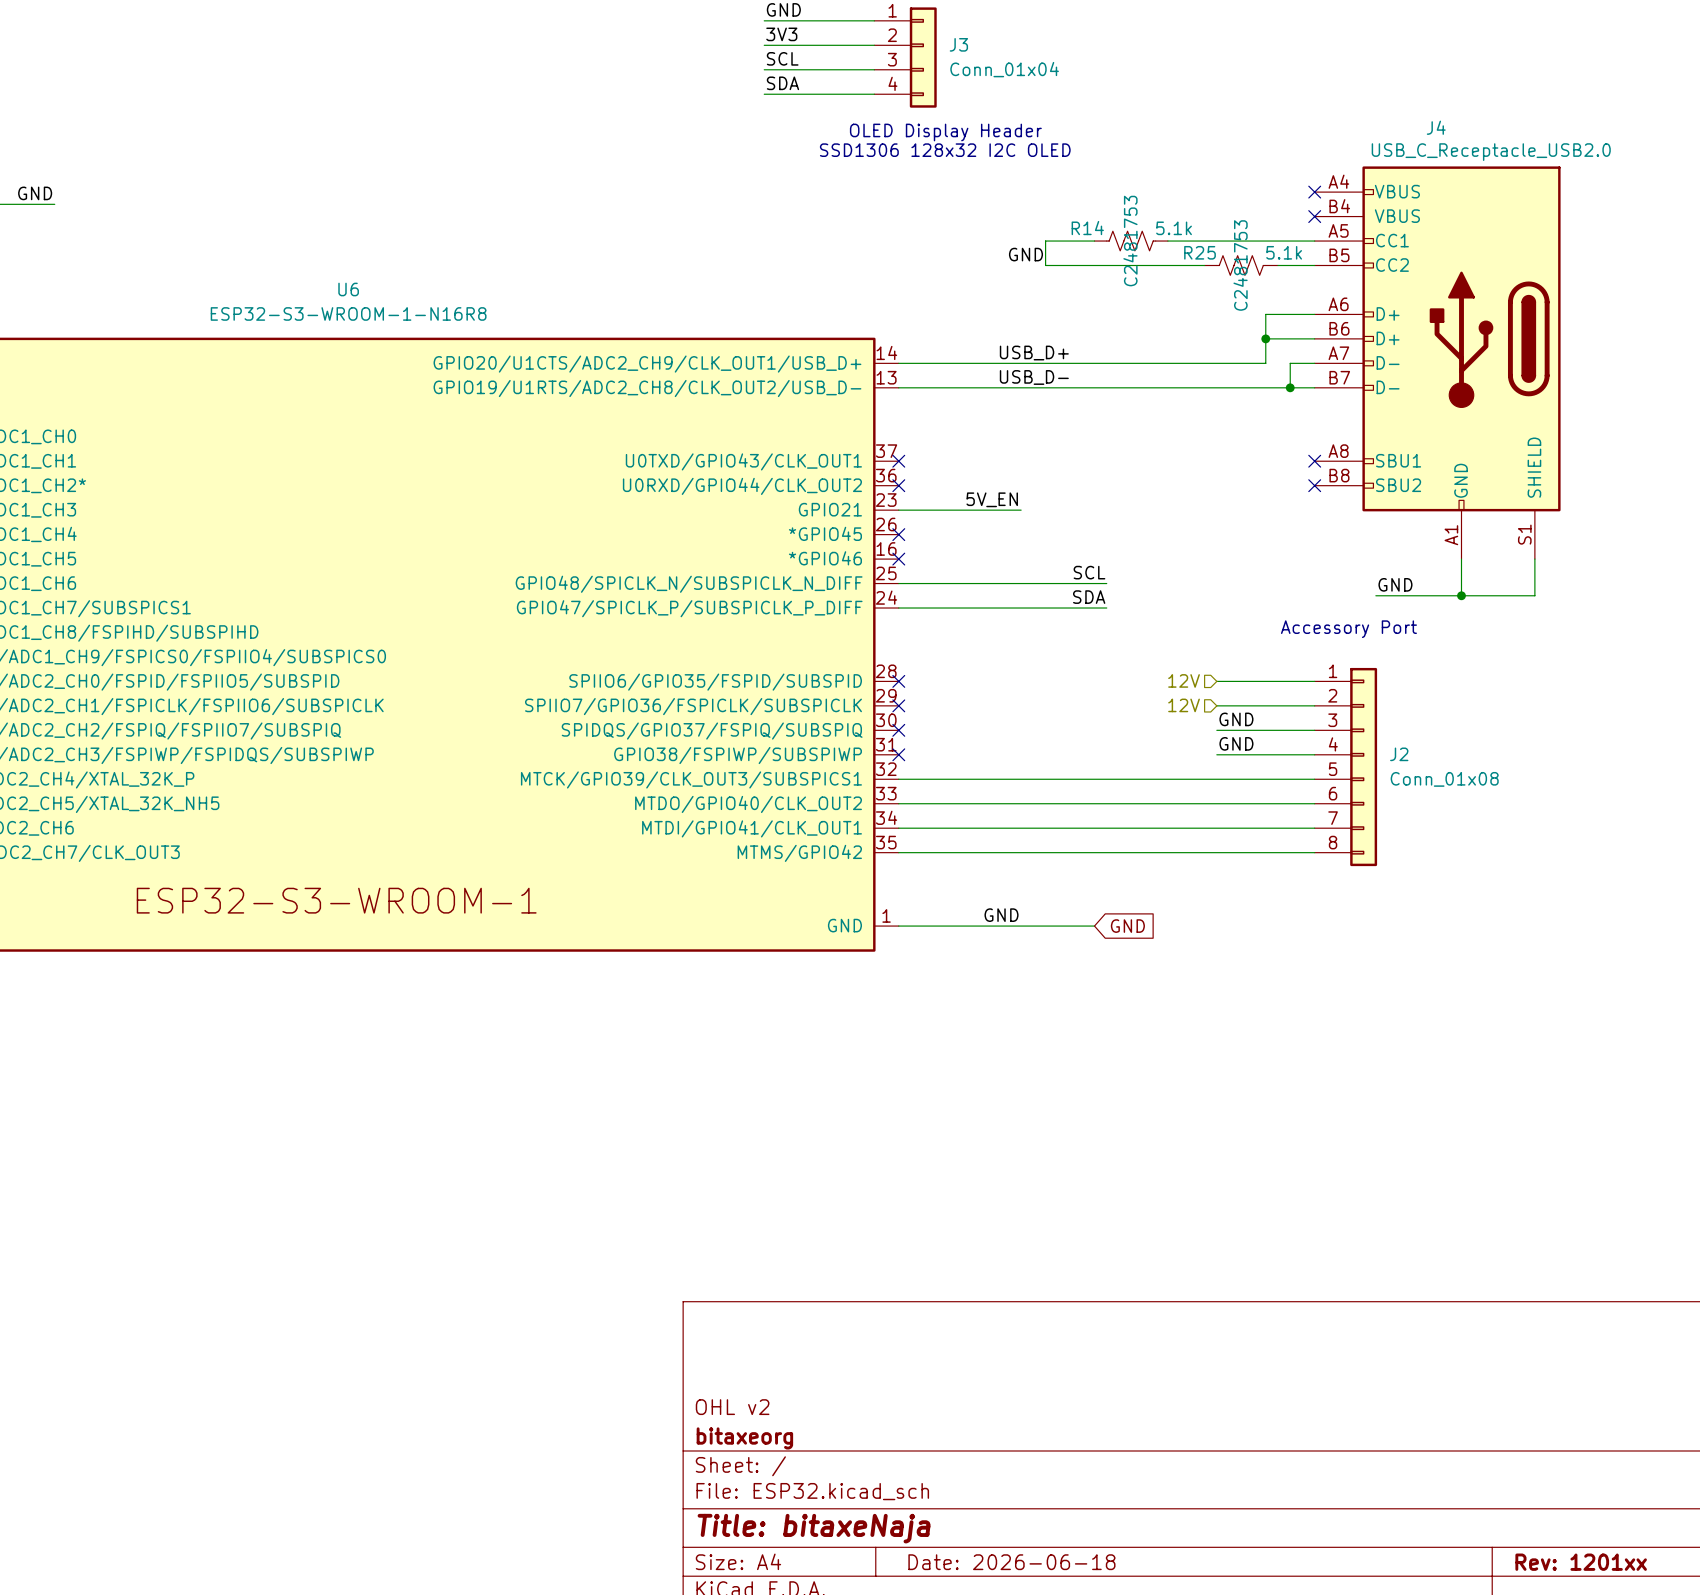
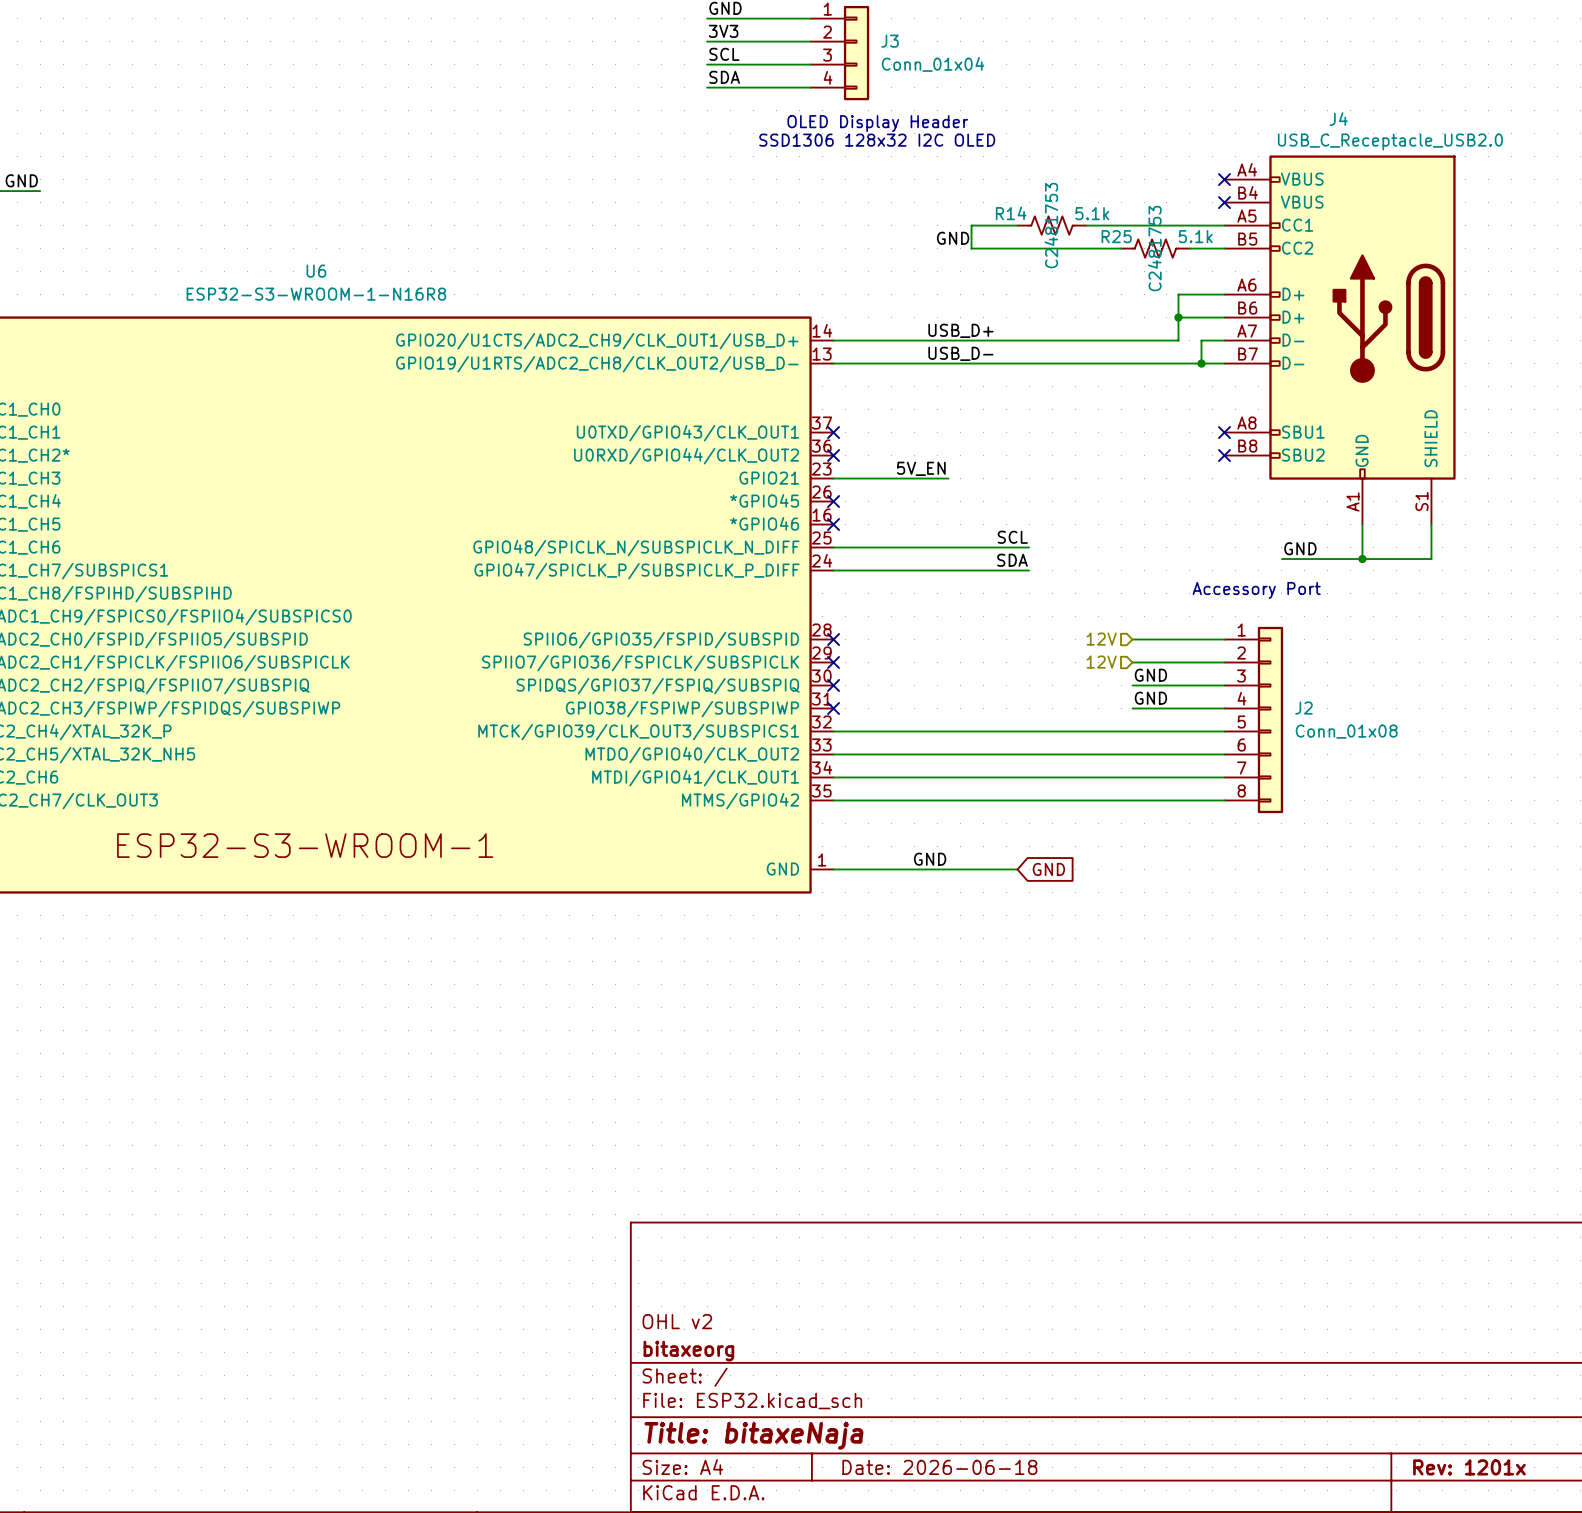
title block: Rev: 1201xx (1581, 1562) -> Rev: 1201x (1469, 1467)

